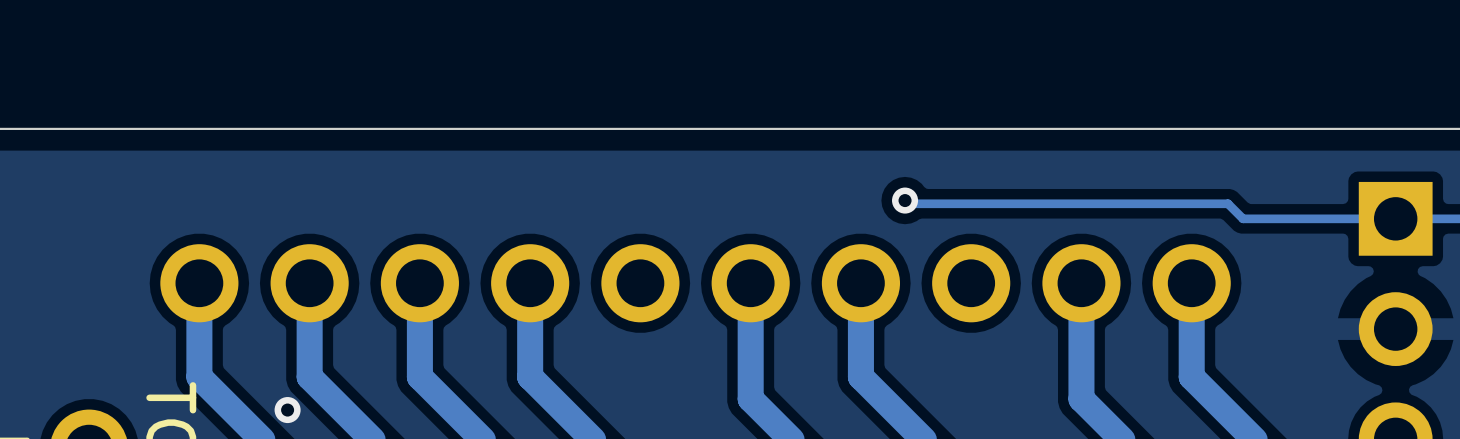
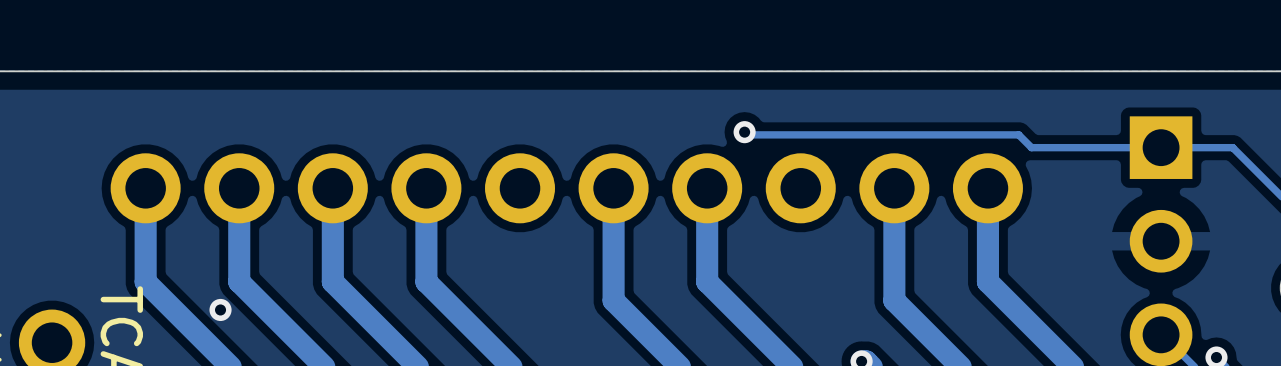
part footprint: [160, 244, 1231, 323] -> [110, 153, 1023, 224]

